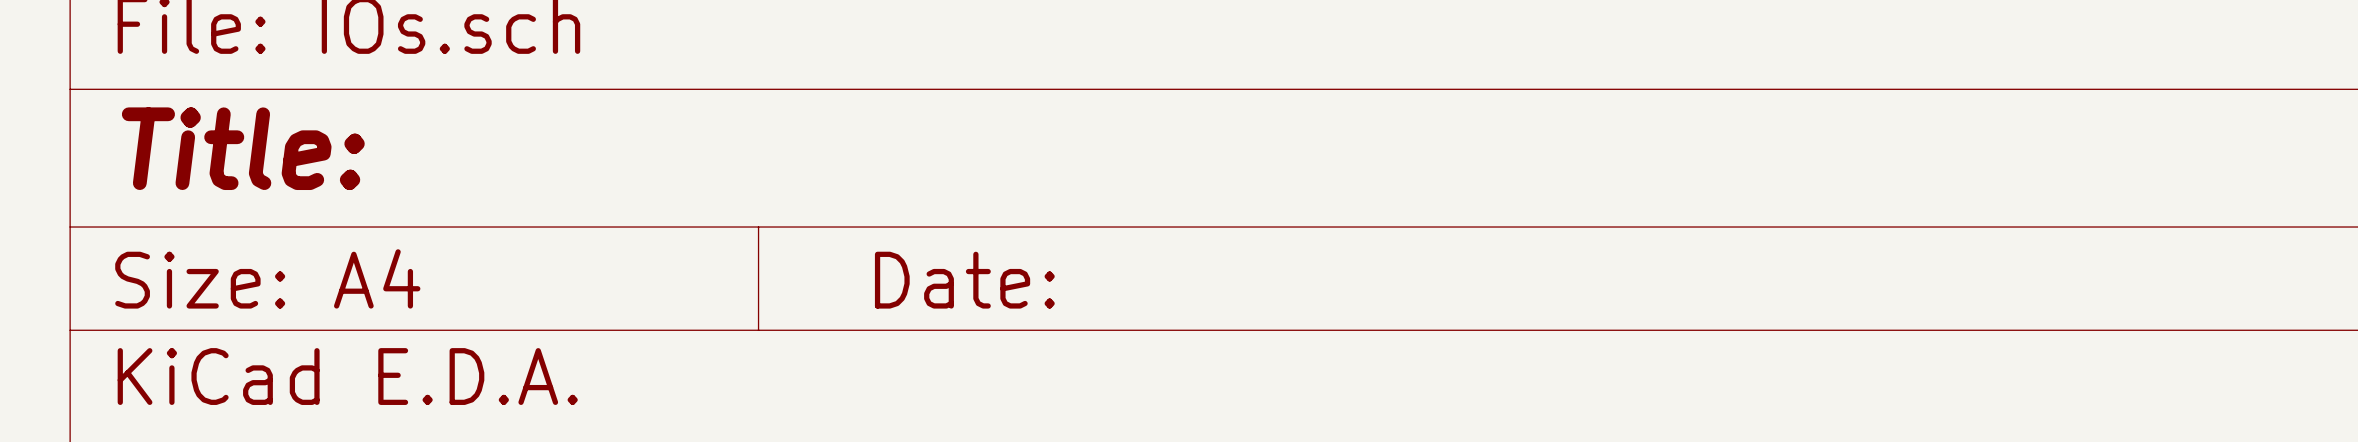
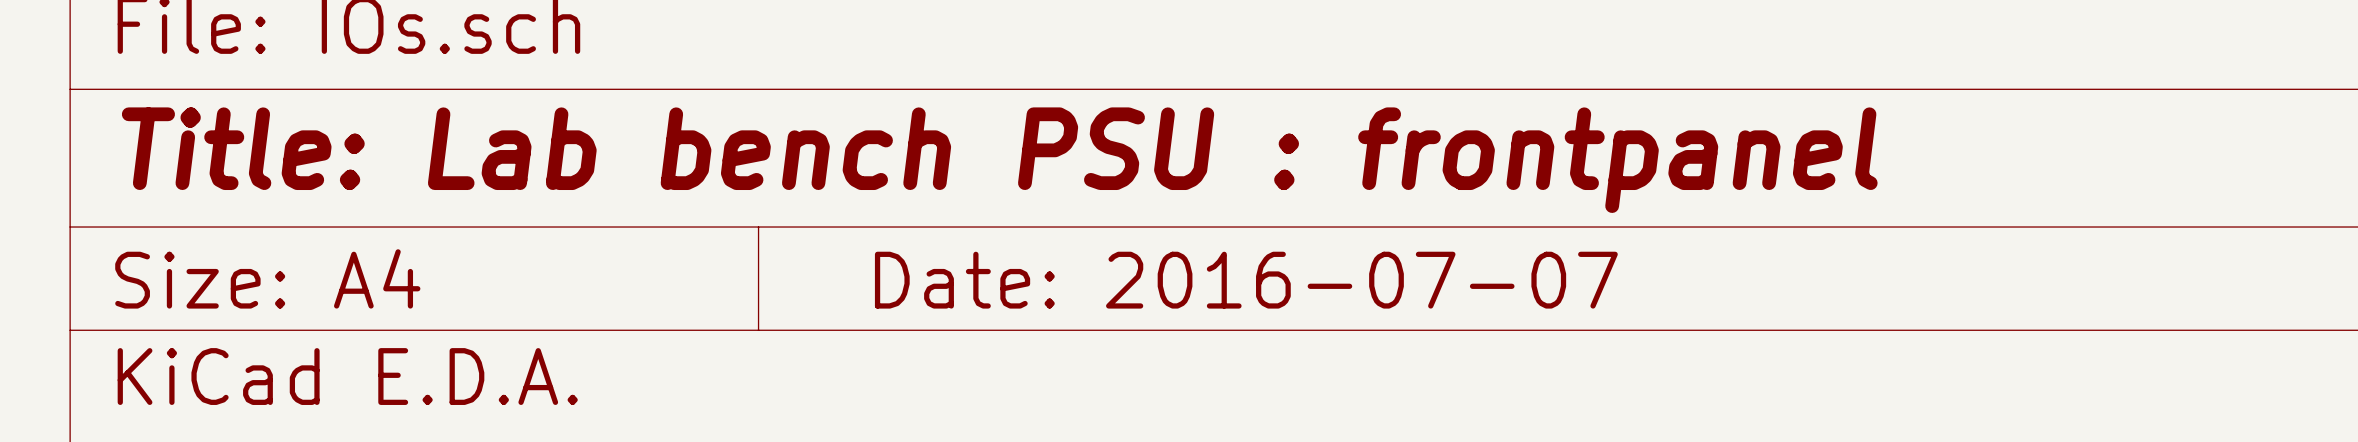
title block: Title: (243, 148) -> Title: Lab bench PSU : frontpanel (999, 160)
title block: Date: (964, 280) -> Date: 2016-07-07 (1246, 280)

